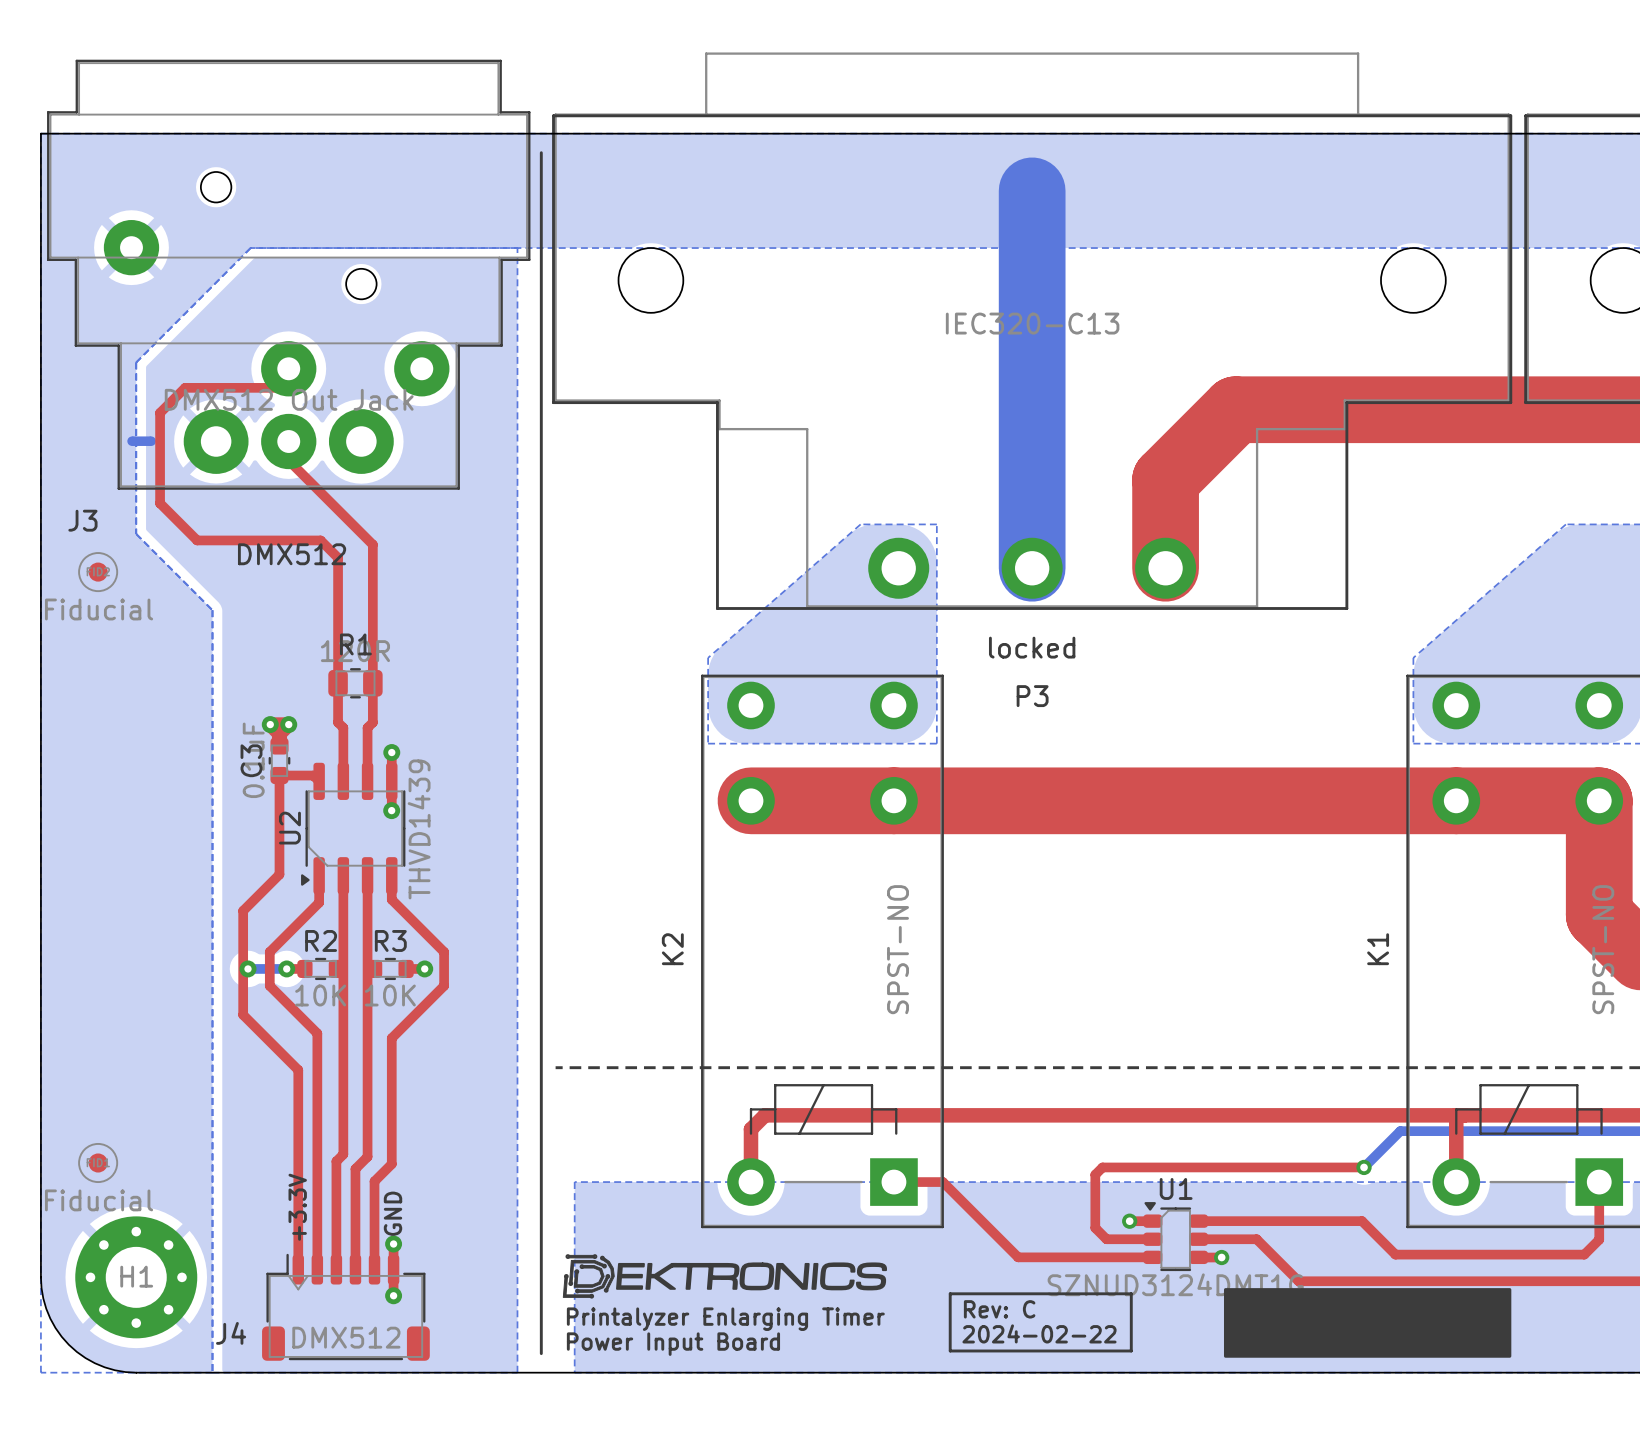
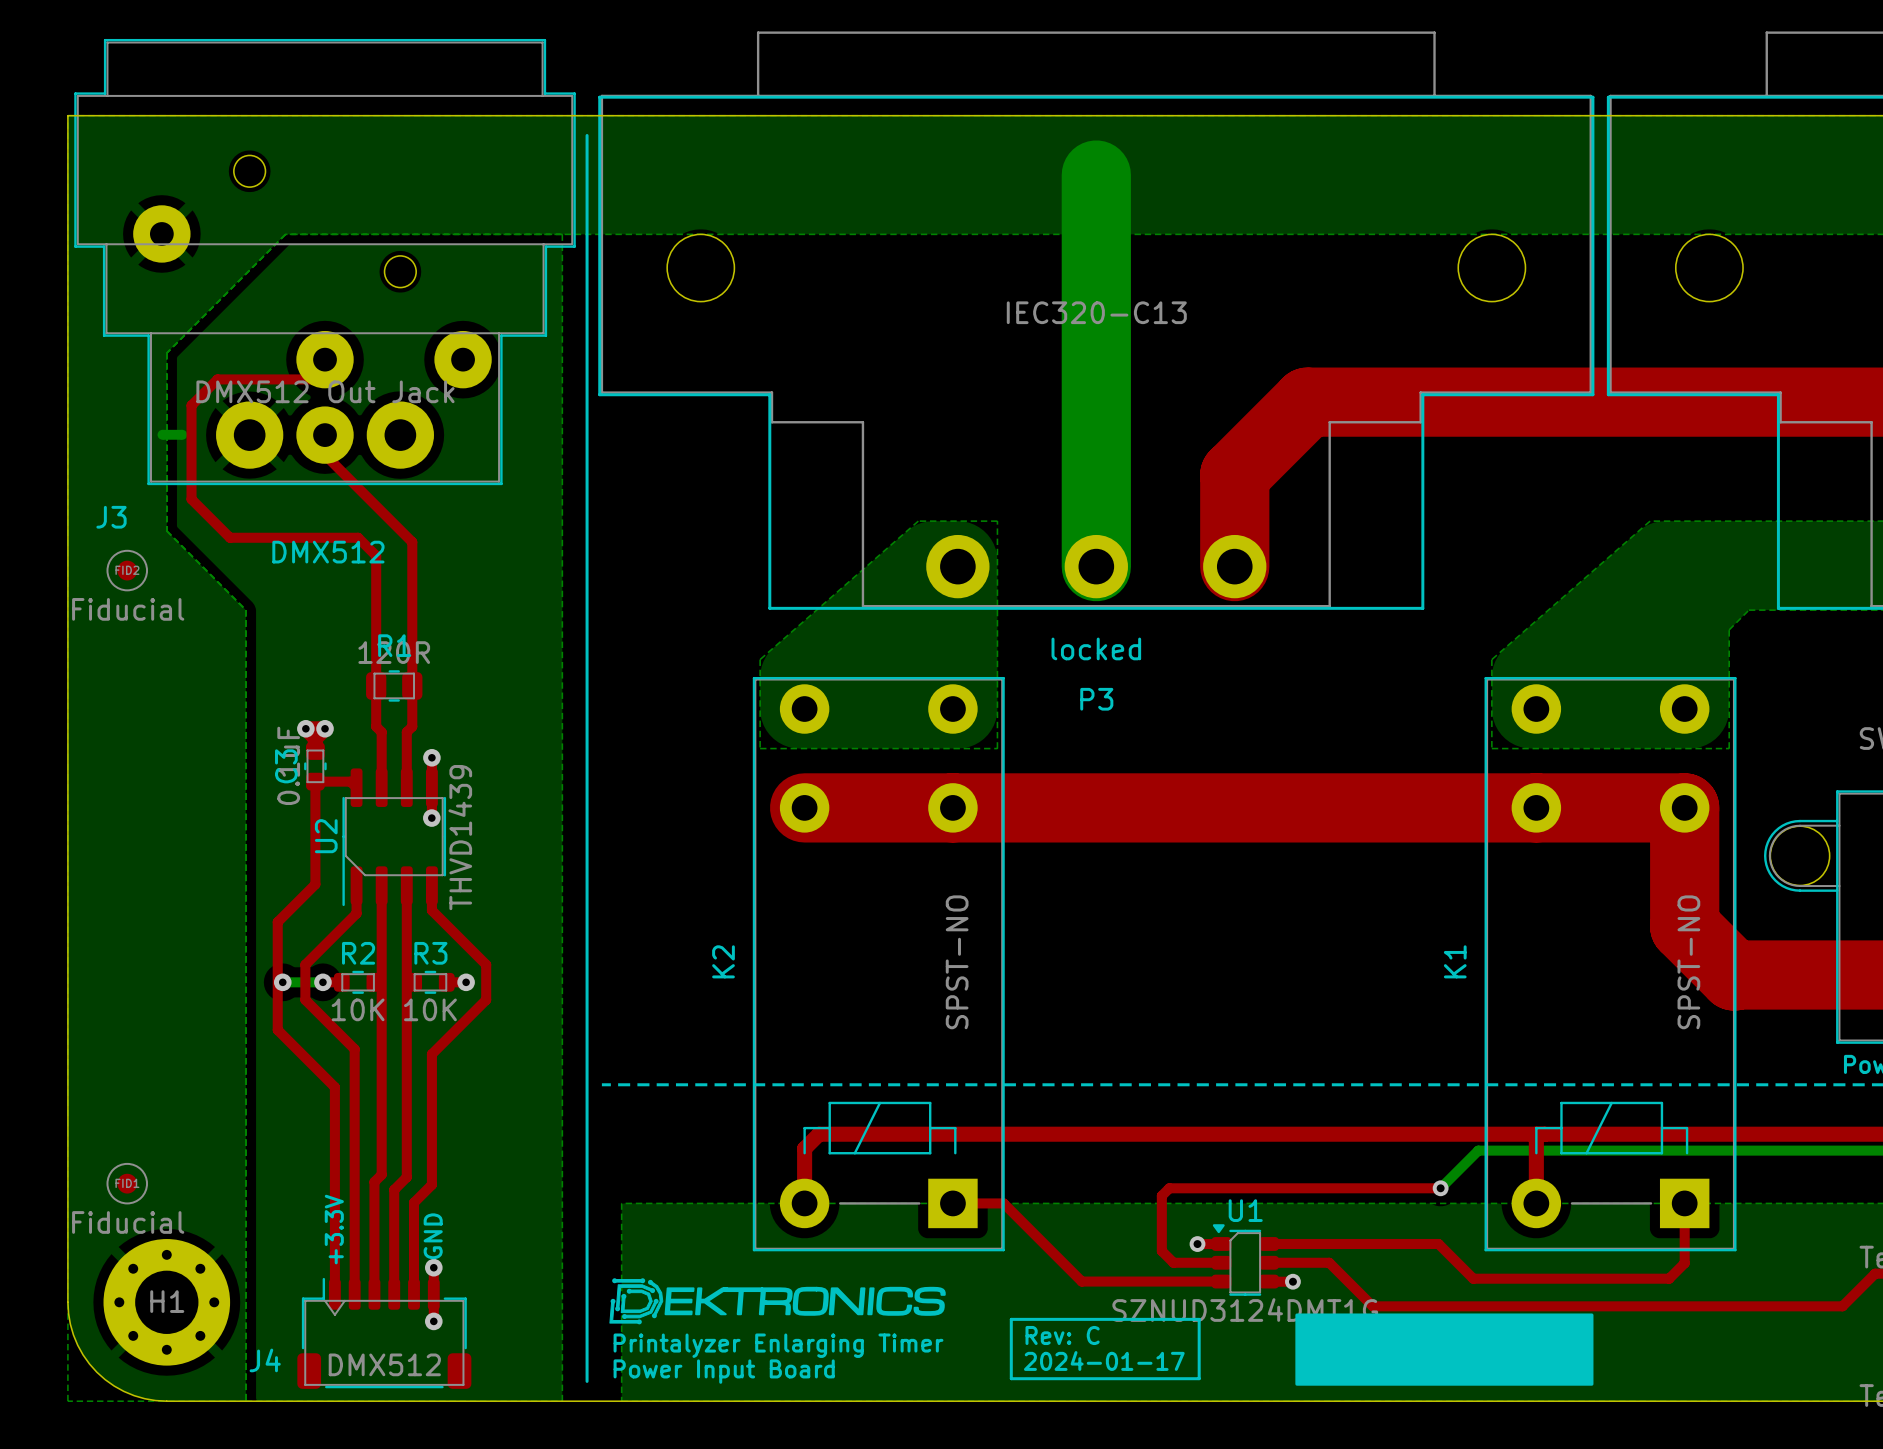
U2 footprint: [301, 762, 406, 895] -> [342, 768, 447, 907]
text: 2024-02-22 (1039, 1333) -> 2024-01-17 (1104, 1360)

